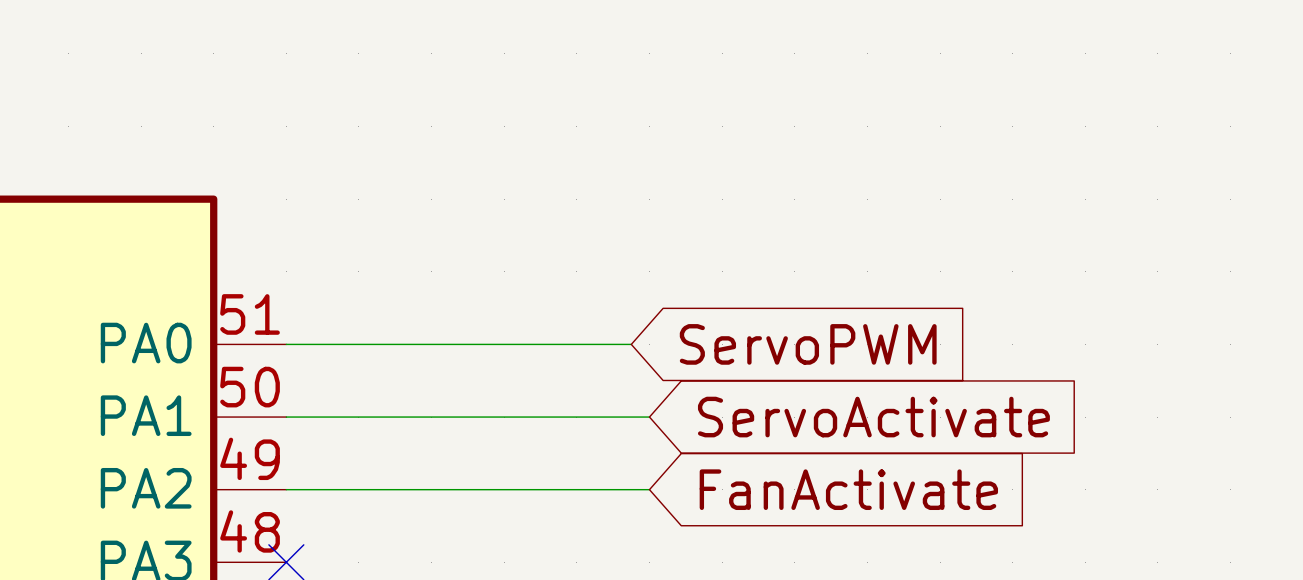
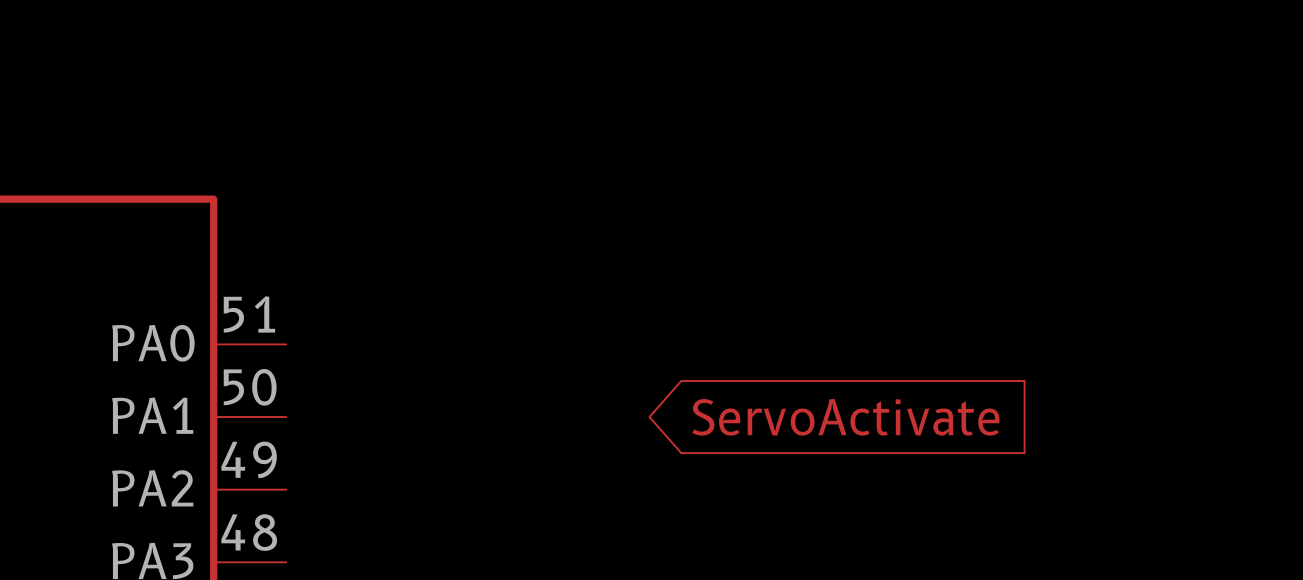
wire: (286, 344) (631, 344) -> none
global label: ServoPWM (808, 344) -> none
wire: (286, 417) (649, 417) -> none
wire: (286, 489) (649, 489) -> none
global label: FanActivate (848, 489) -> none
no-connect mark: (286, 562) -> none

